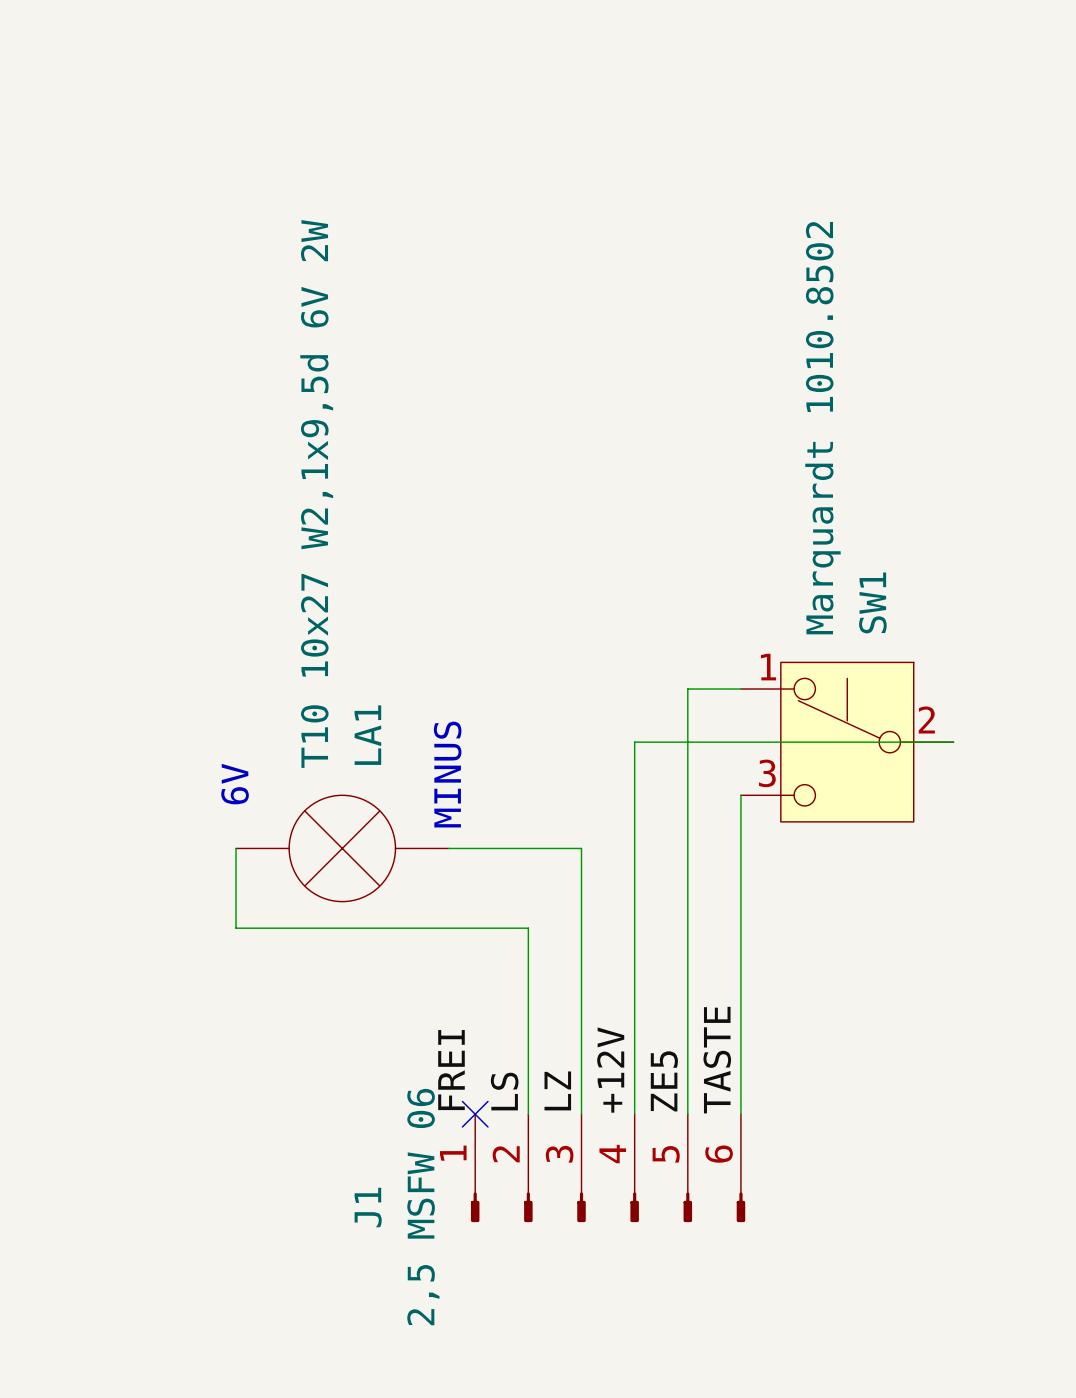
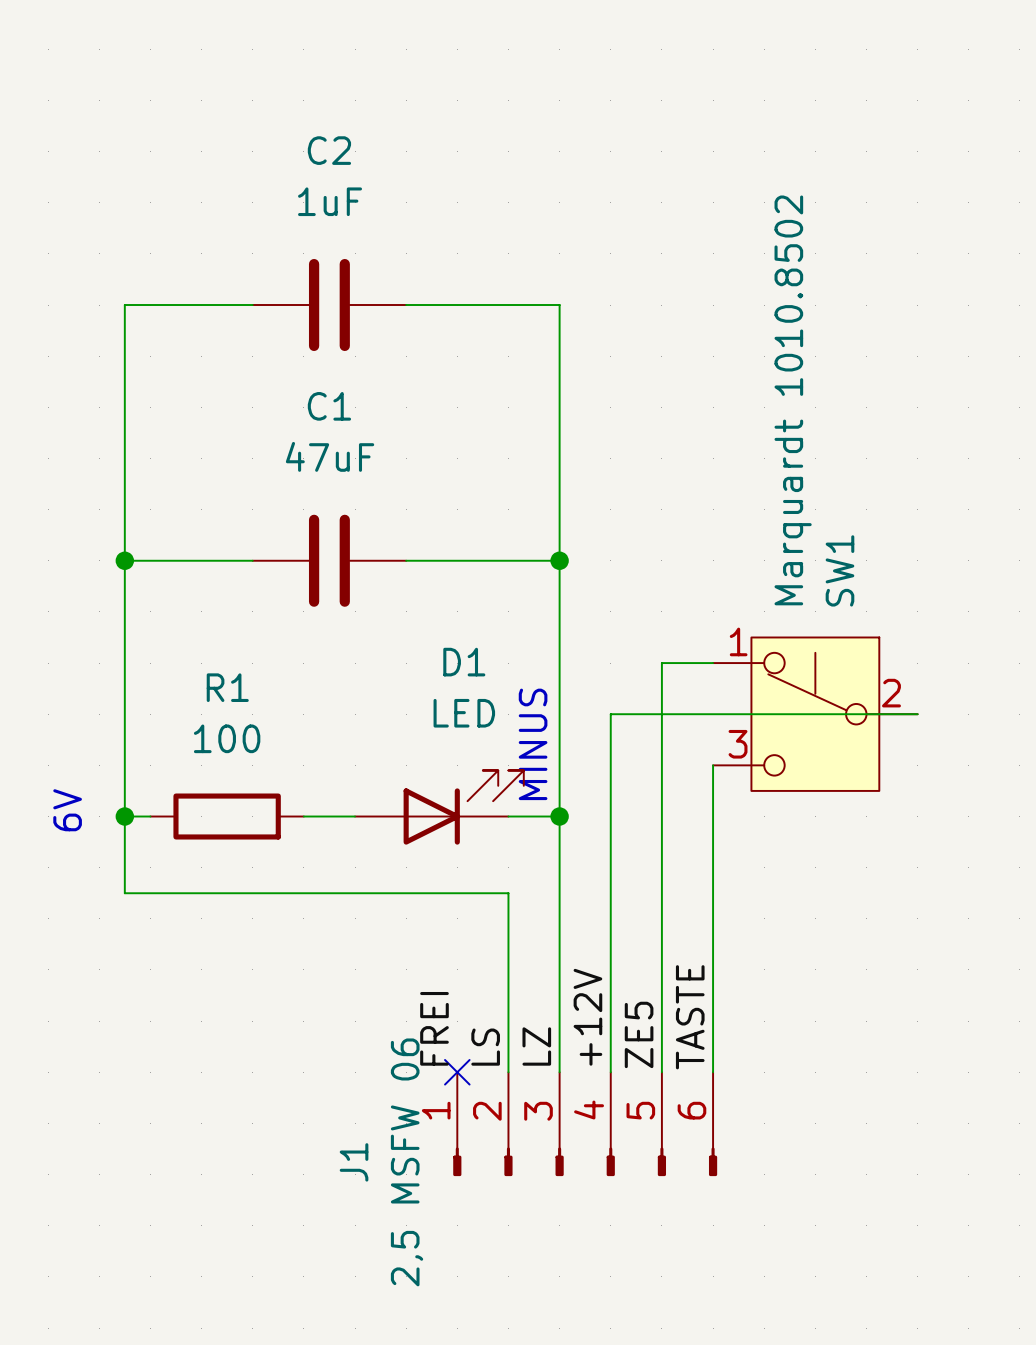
C2: none -> 1uF (329, 305)
wire: none -> (406, 305) (559, 305) (559, 816)
wire: none -> (124, 560) (252, 560)
junction: none -> (124, 560)
C1: none -> 47uF (329, 560)
wire: none -> (406, 560) (559, 560)
junction: none -> (559, 560)
text position: MINUS (447, 774) -> MINUS (533, 744)
text position: 6V (235, 784) -> 6V (67, 810)
D1: none -> LED (439, 807)
wire: none -> (124, 816) (150, 816)
junction: none -> (124, 816)
wire: (236, 848) (236, 928) -> (252, 305) (124, 305) (124, 893) (227, 893)
R1: none -> 100 (227, 816)
wire: none -> (303, 816) (355, 816)
LA1: T10 10x27 W2,1x9,5d 6V 2W (342, 848) -> none
junction: none -> (559, 816)

